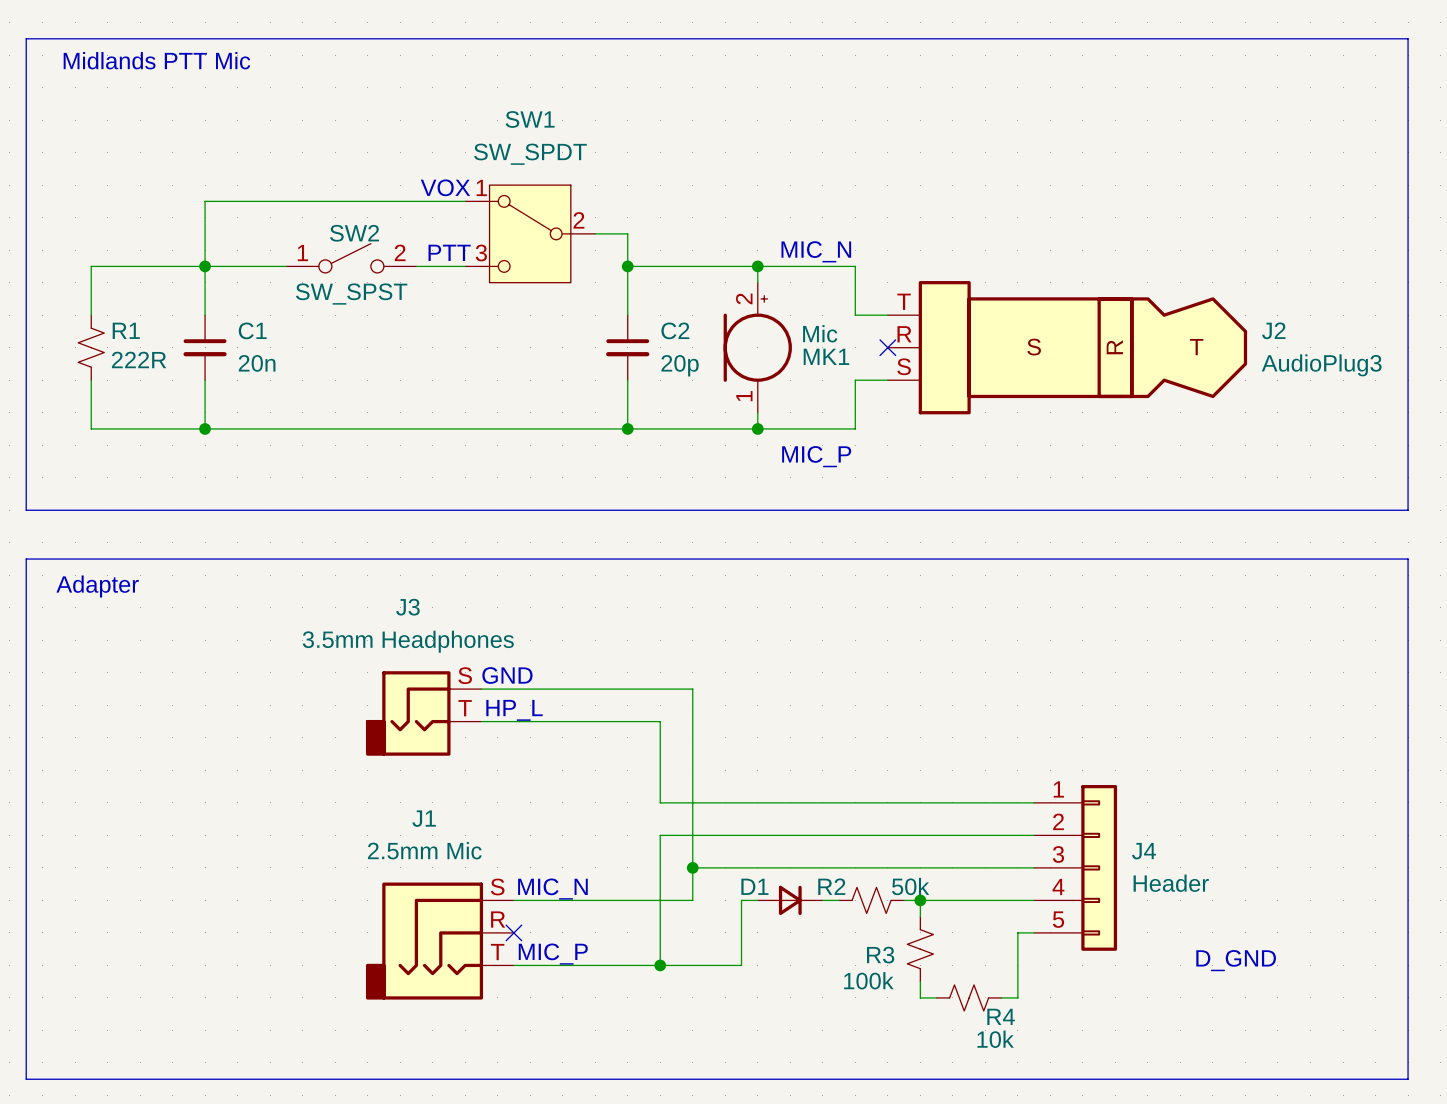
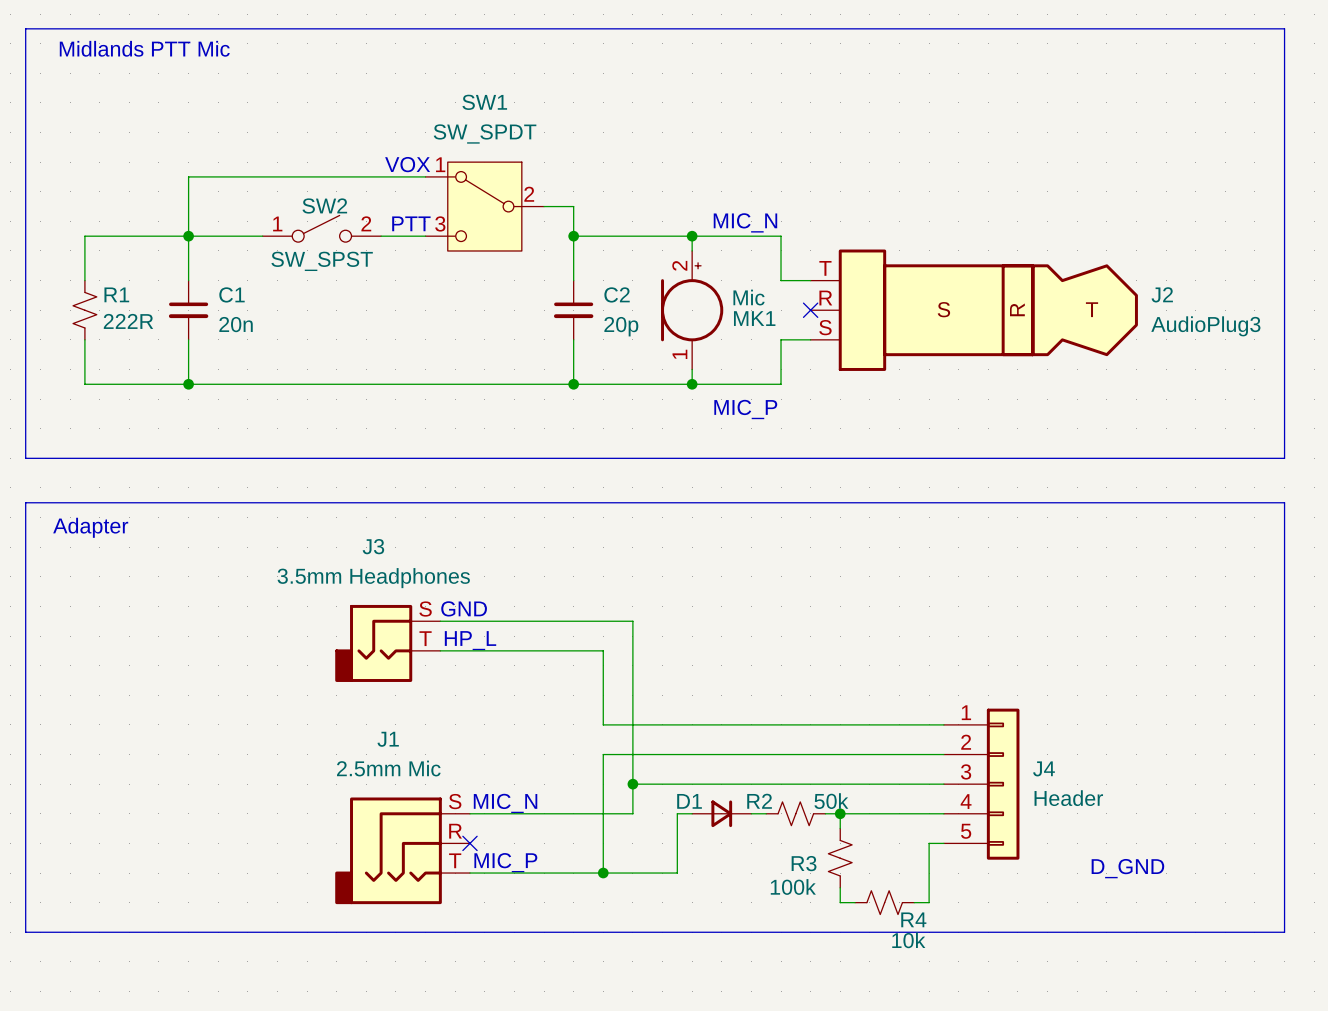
line: (26, 1030) (26, 1079) (1408, 1079) (1408, 1030) -> (25, 932) (1284, 932)

